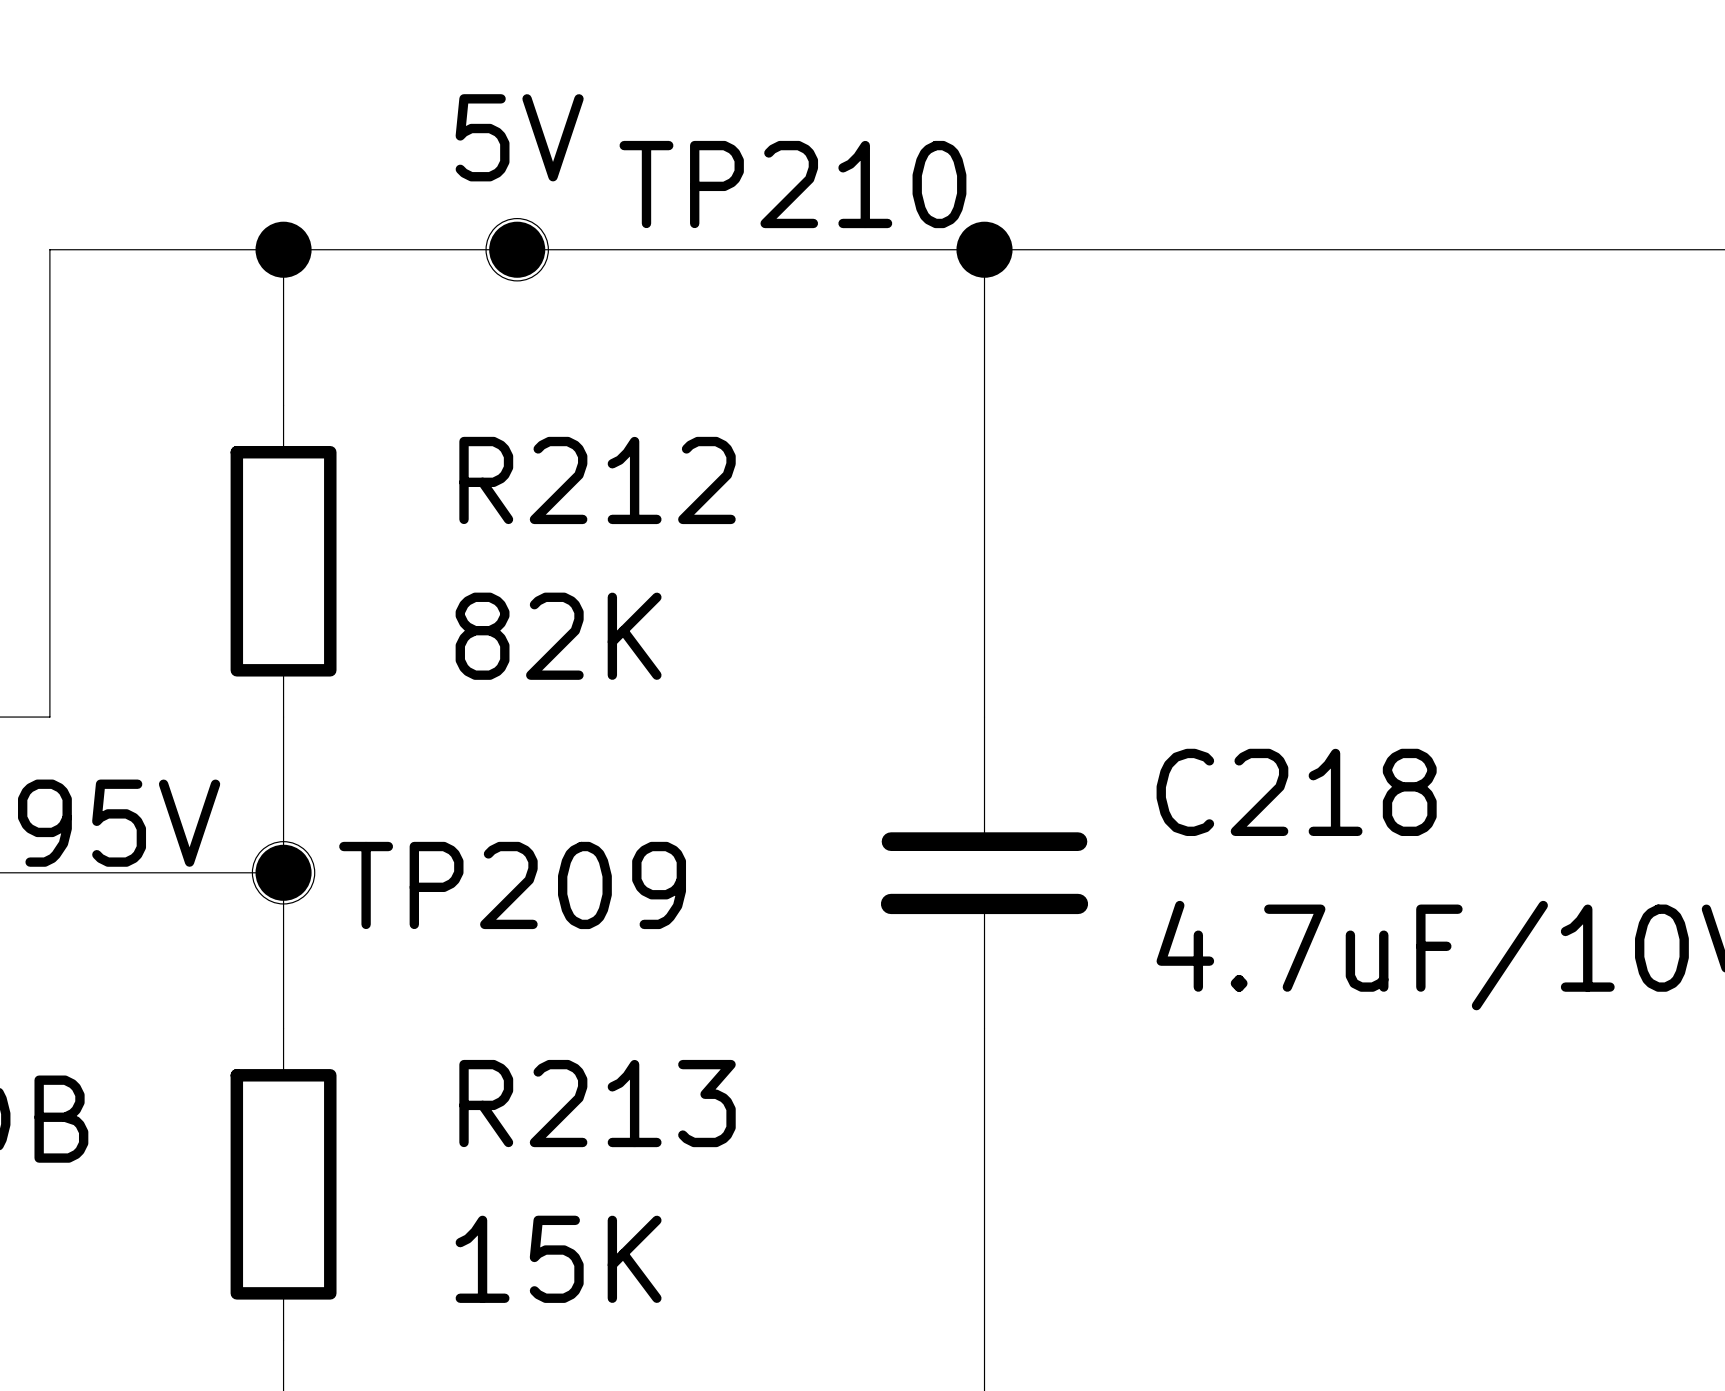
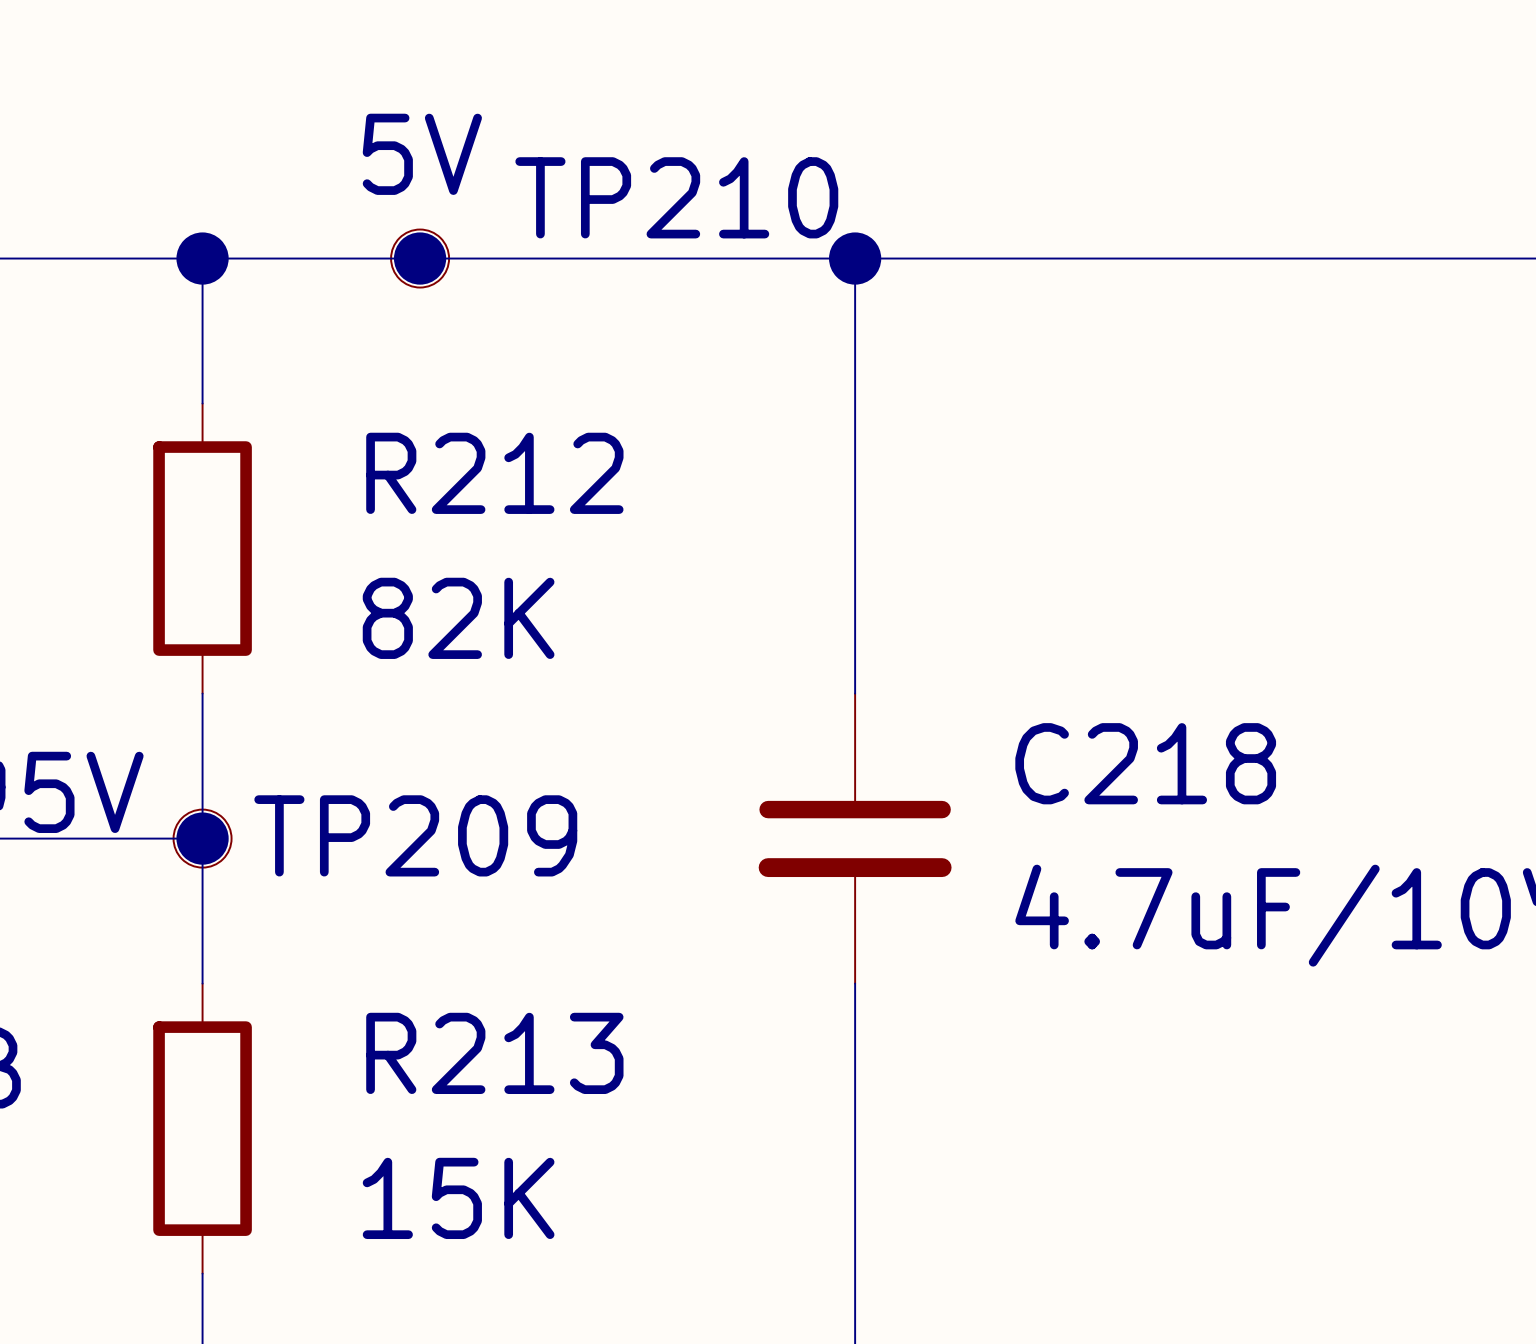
TP209 name position: TP209 (512, 885) -> TP209 (415, 835)

